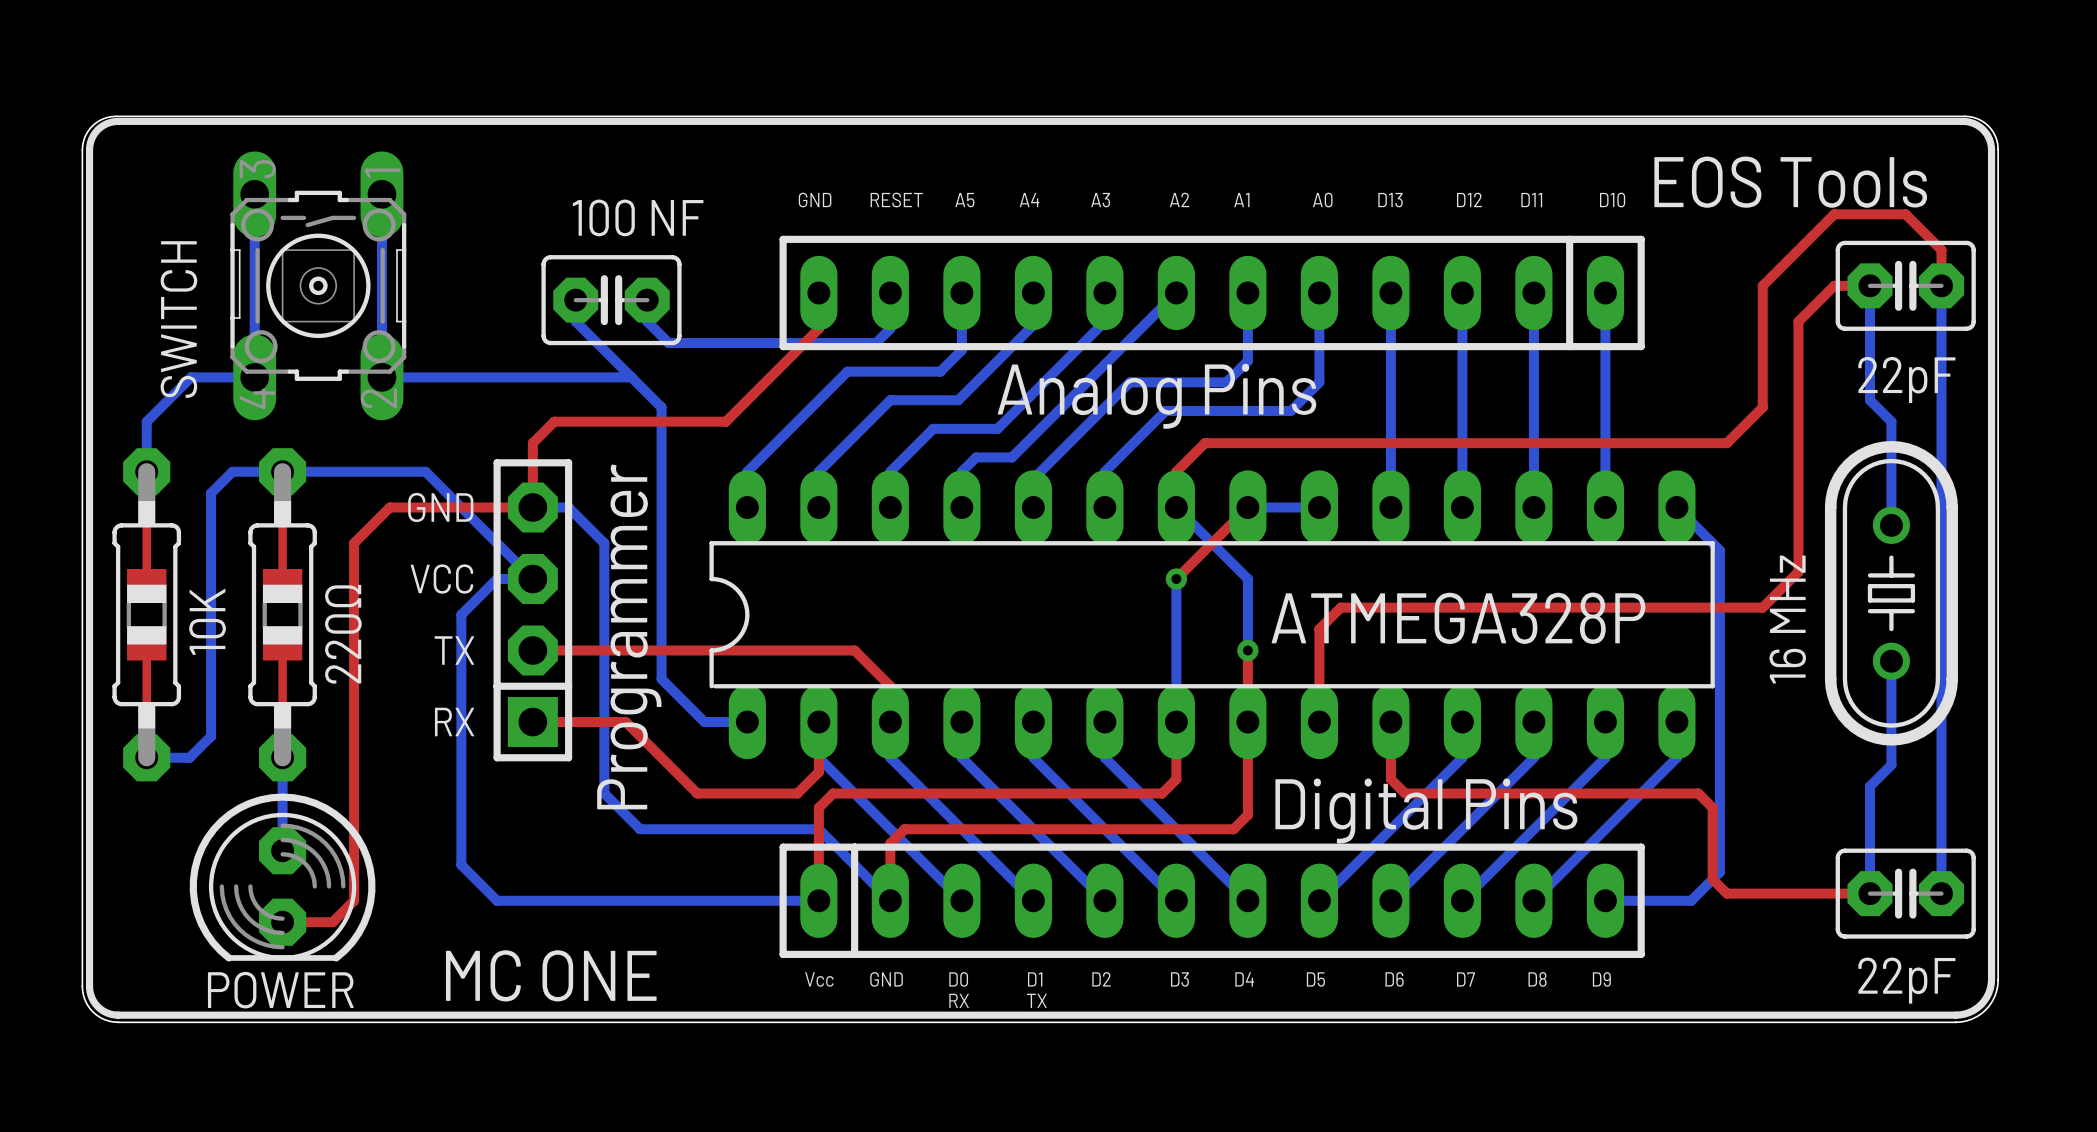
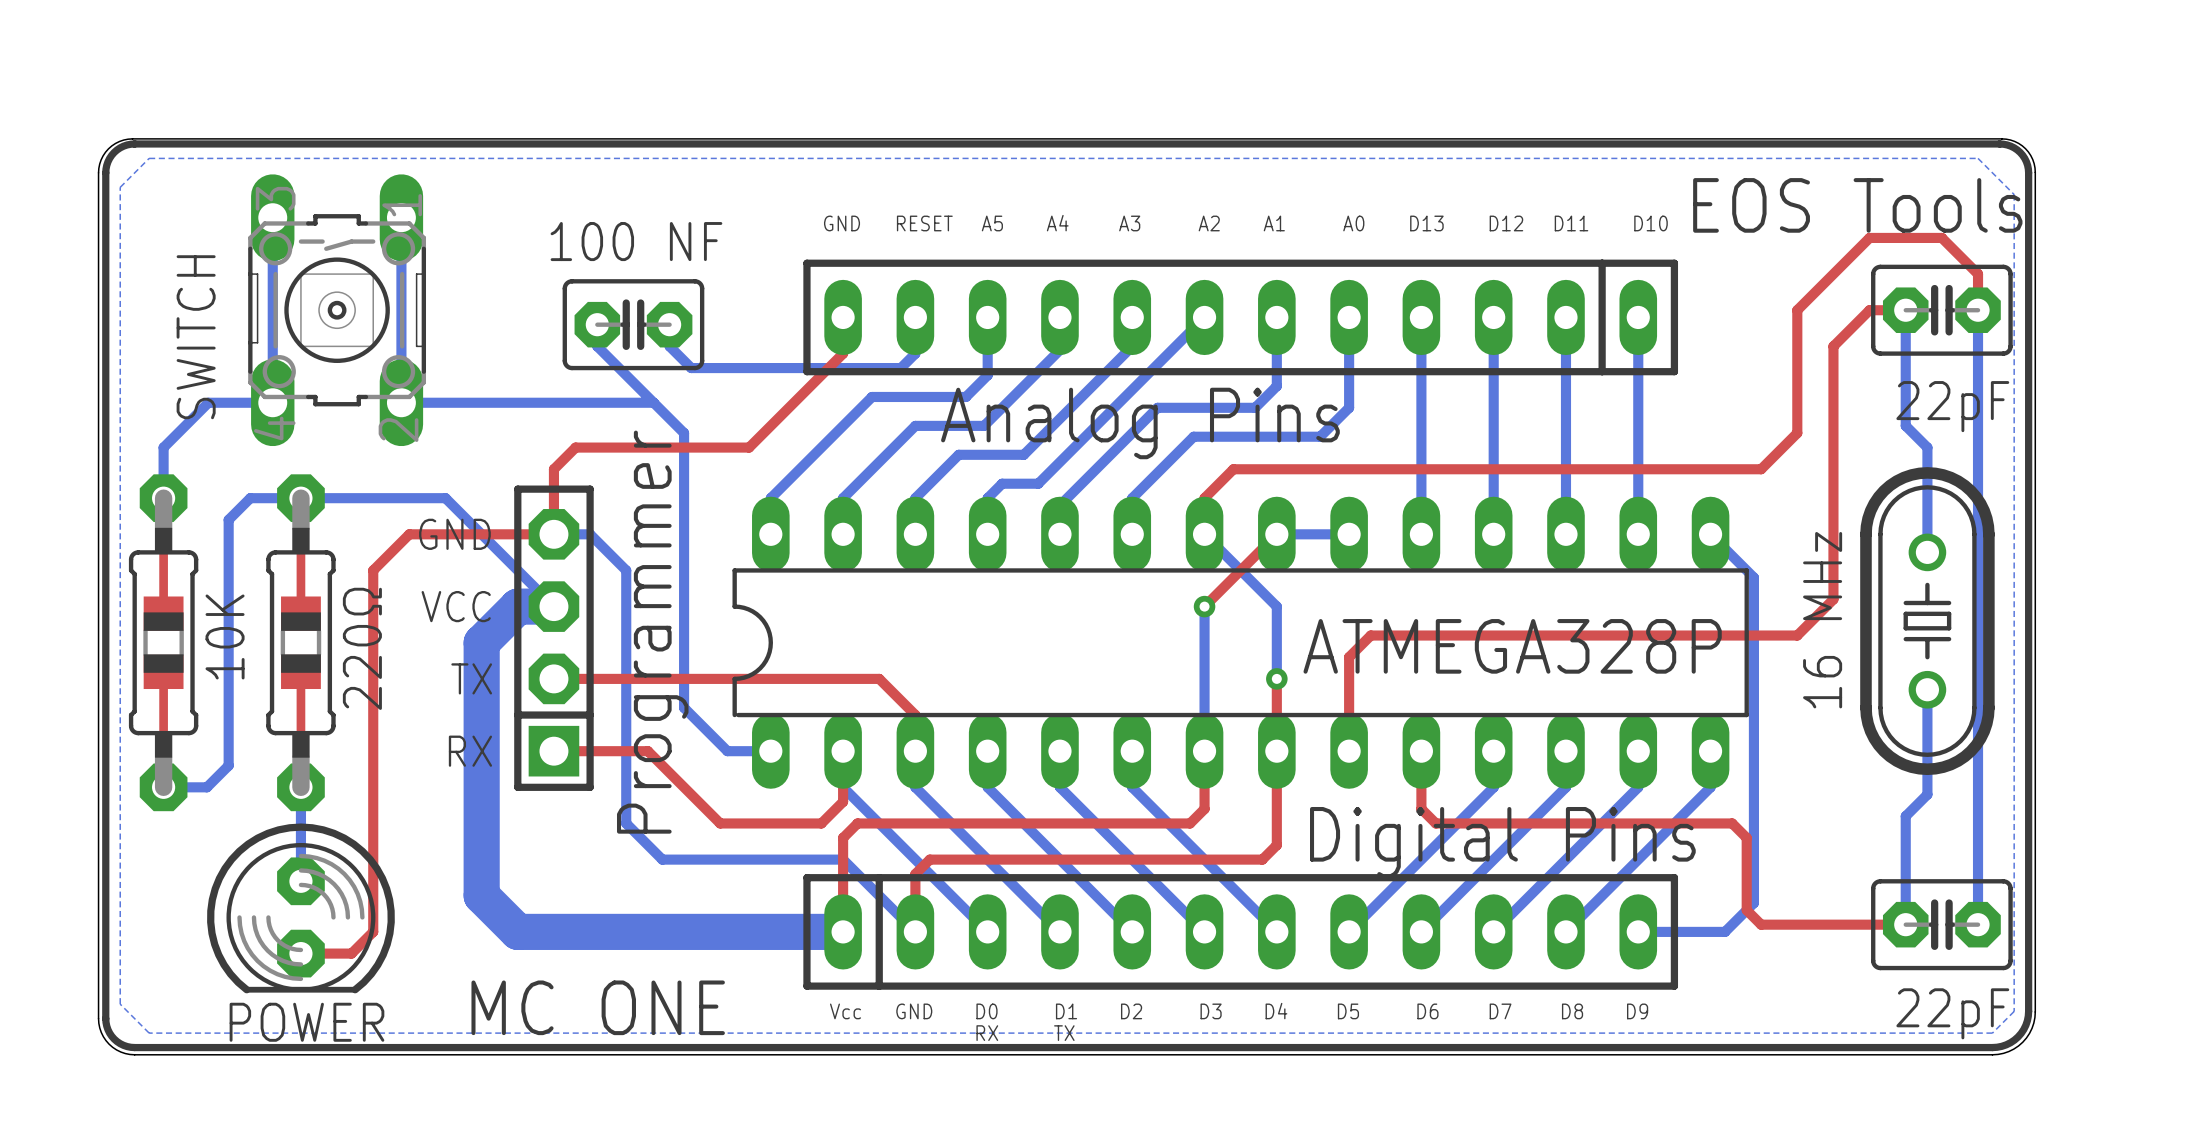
bottom zone outline: none -> (149, 158) (1978, 158) (2014, 194) (2014, 1011) (1992, 1033) (149, 1033) (120, 1004) (120, 187) (149, 158)
bottom track width: thin (532, 579) (497, 579) (461, 614) (461, 865) (497, 900) (818, 900) -> thick (553, 606) (517, 606) (481, 642) (481, 895) (517, 931) (843, 931)

